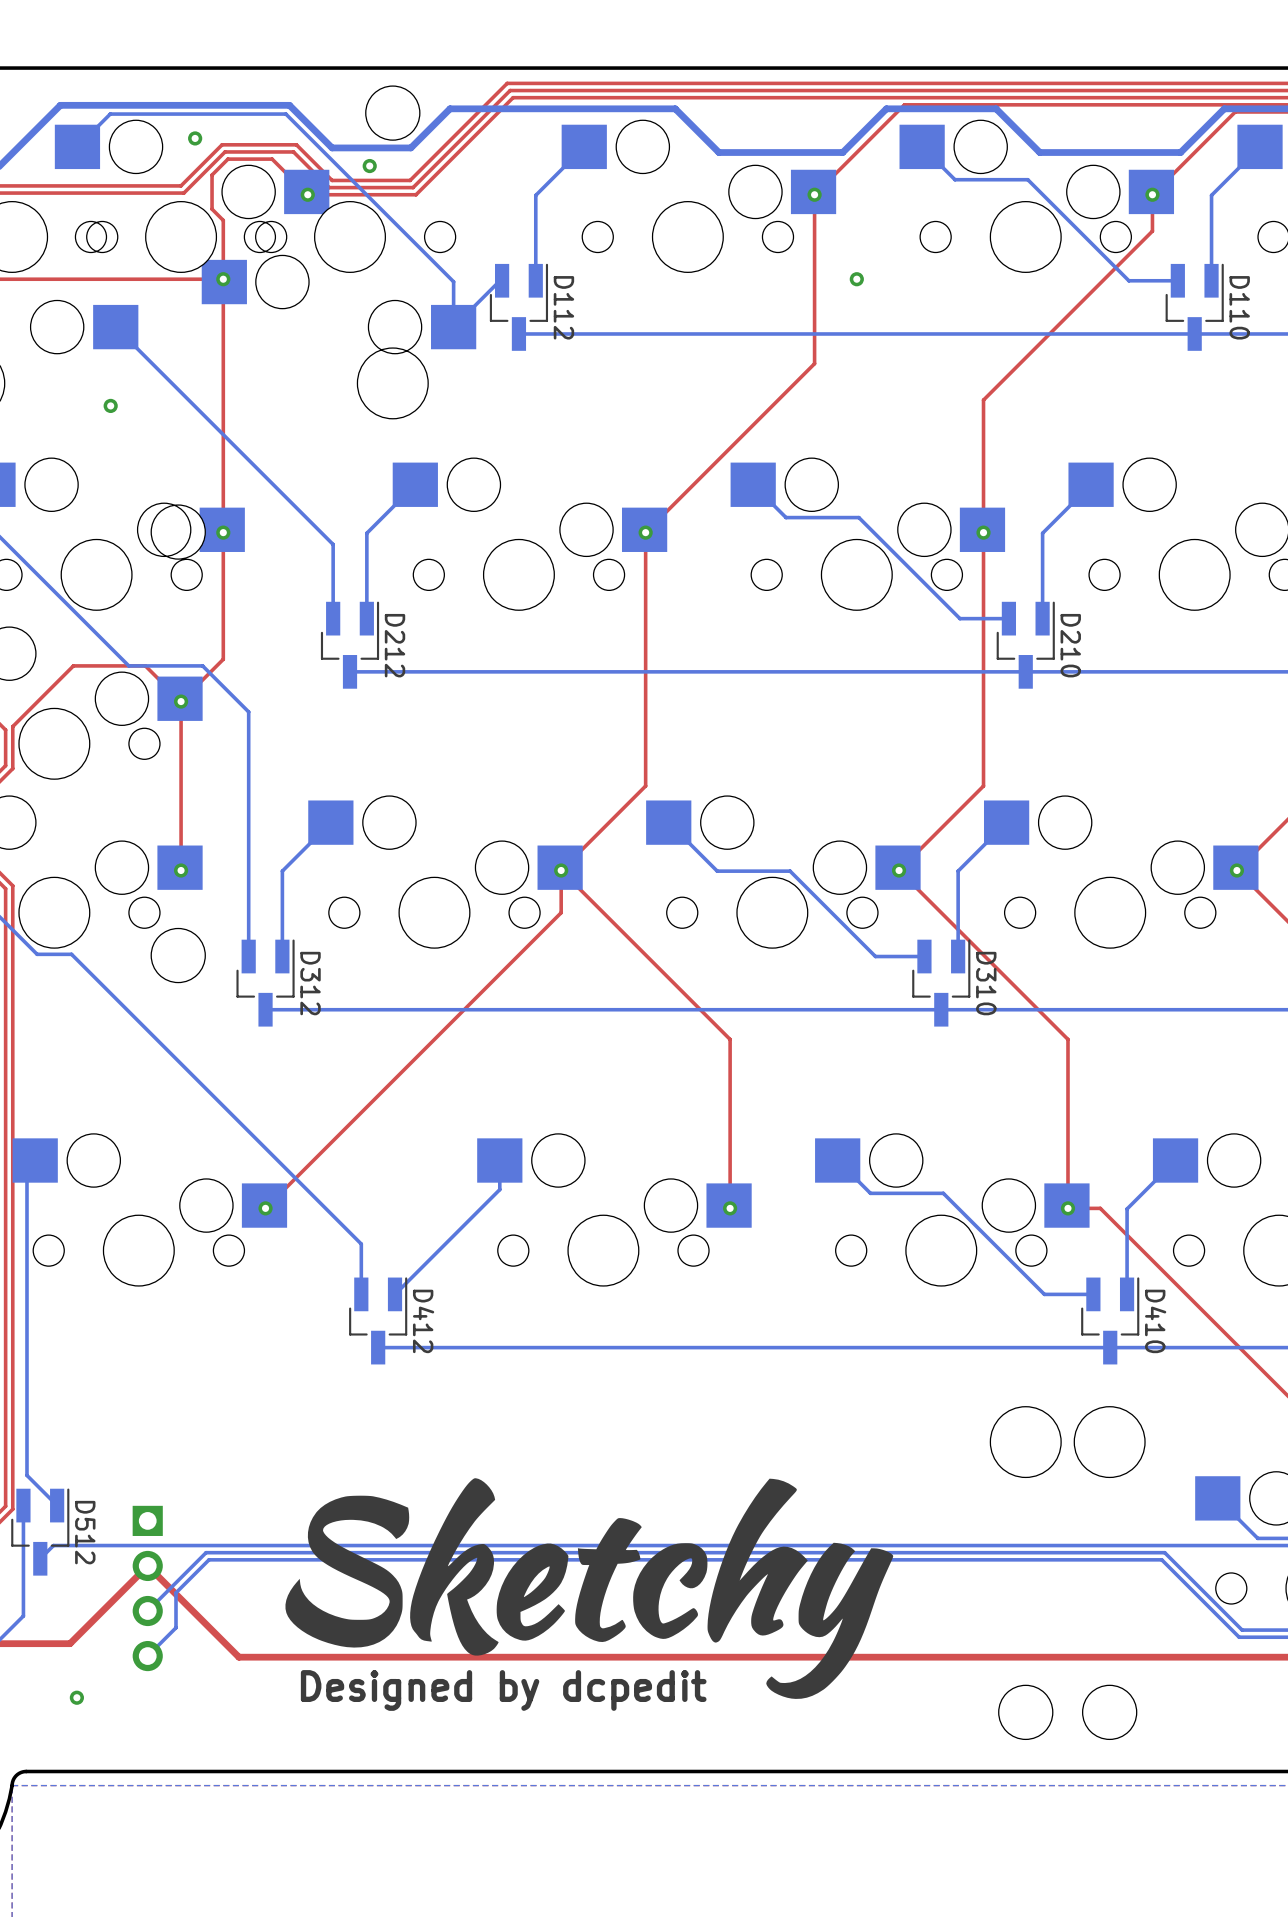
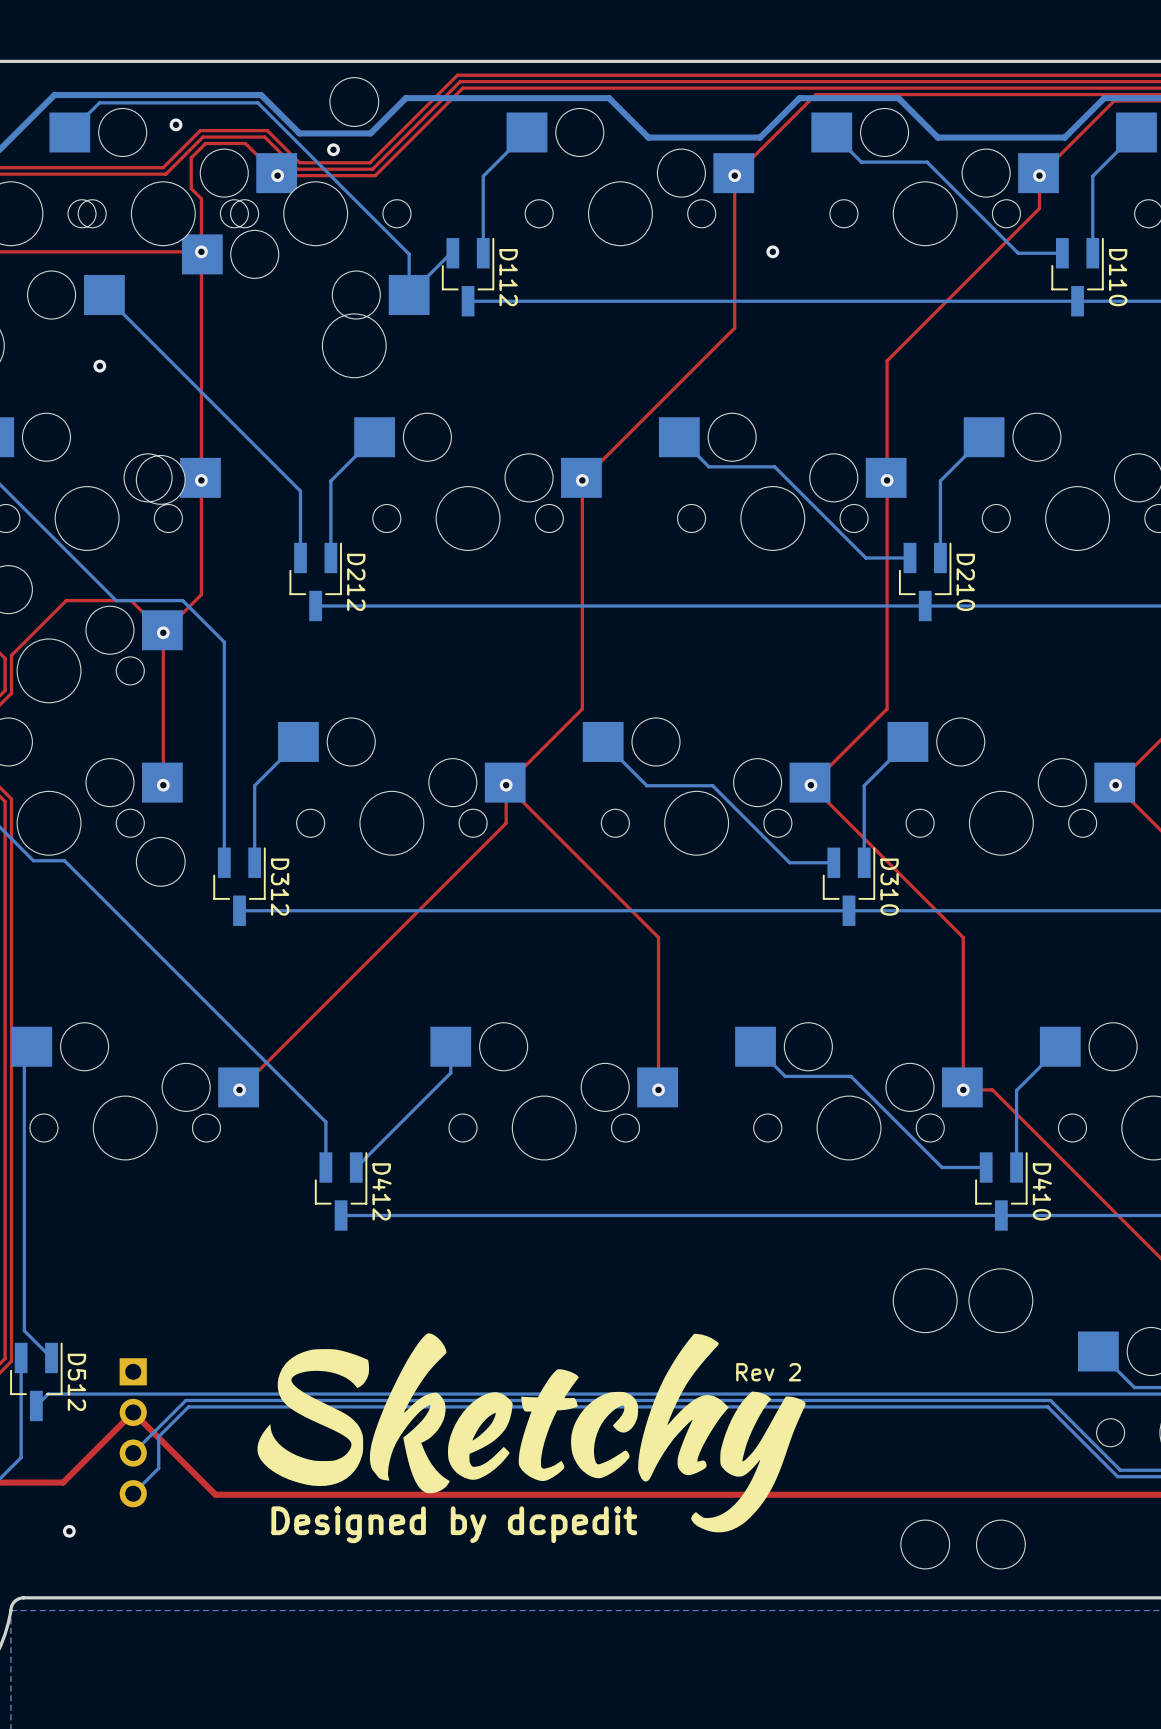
text: none -> Rev 2 (768, 1372)

